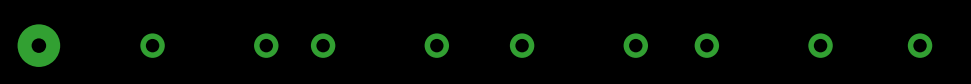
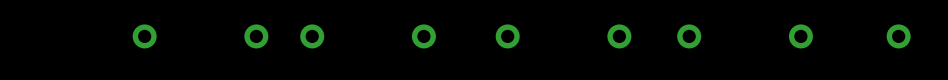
part: (38, 45) -> none

